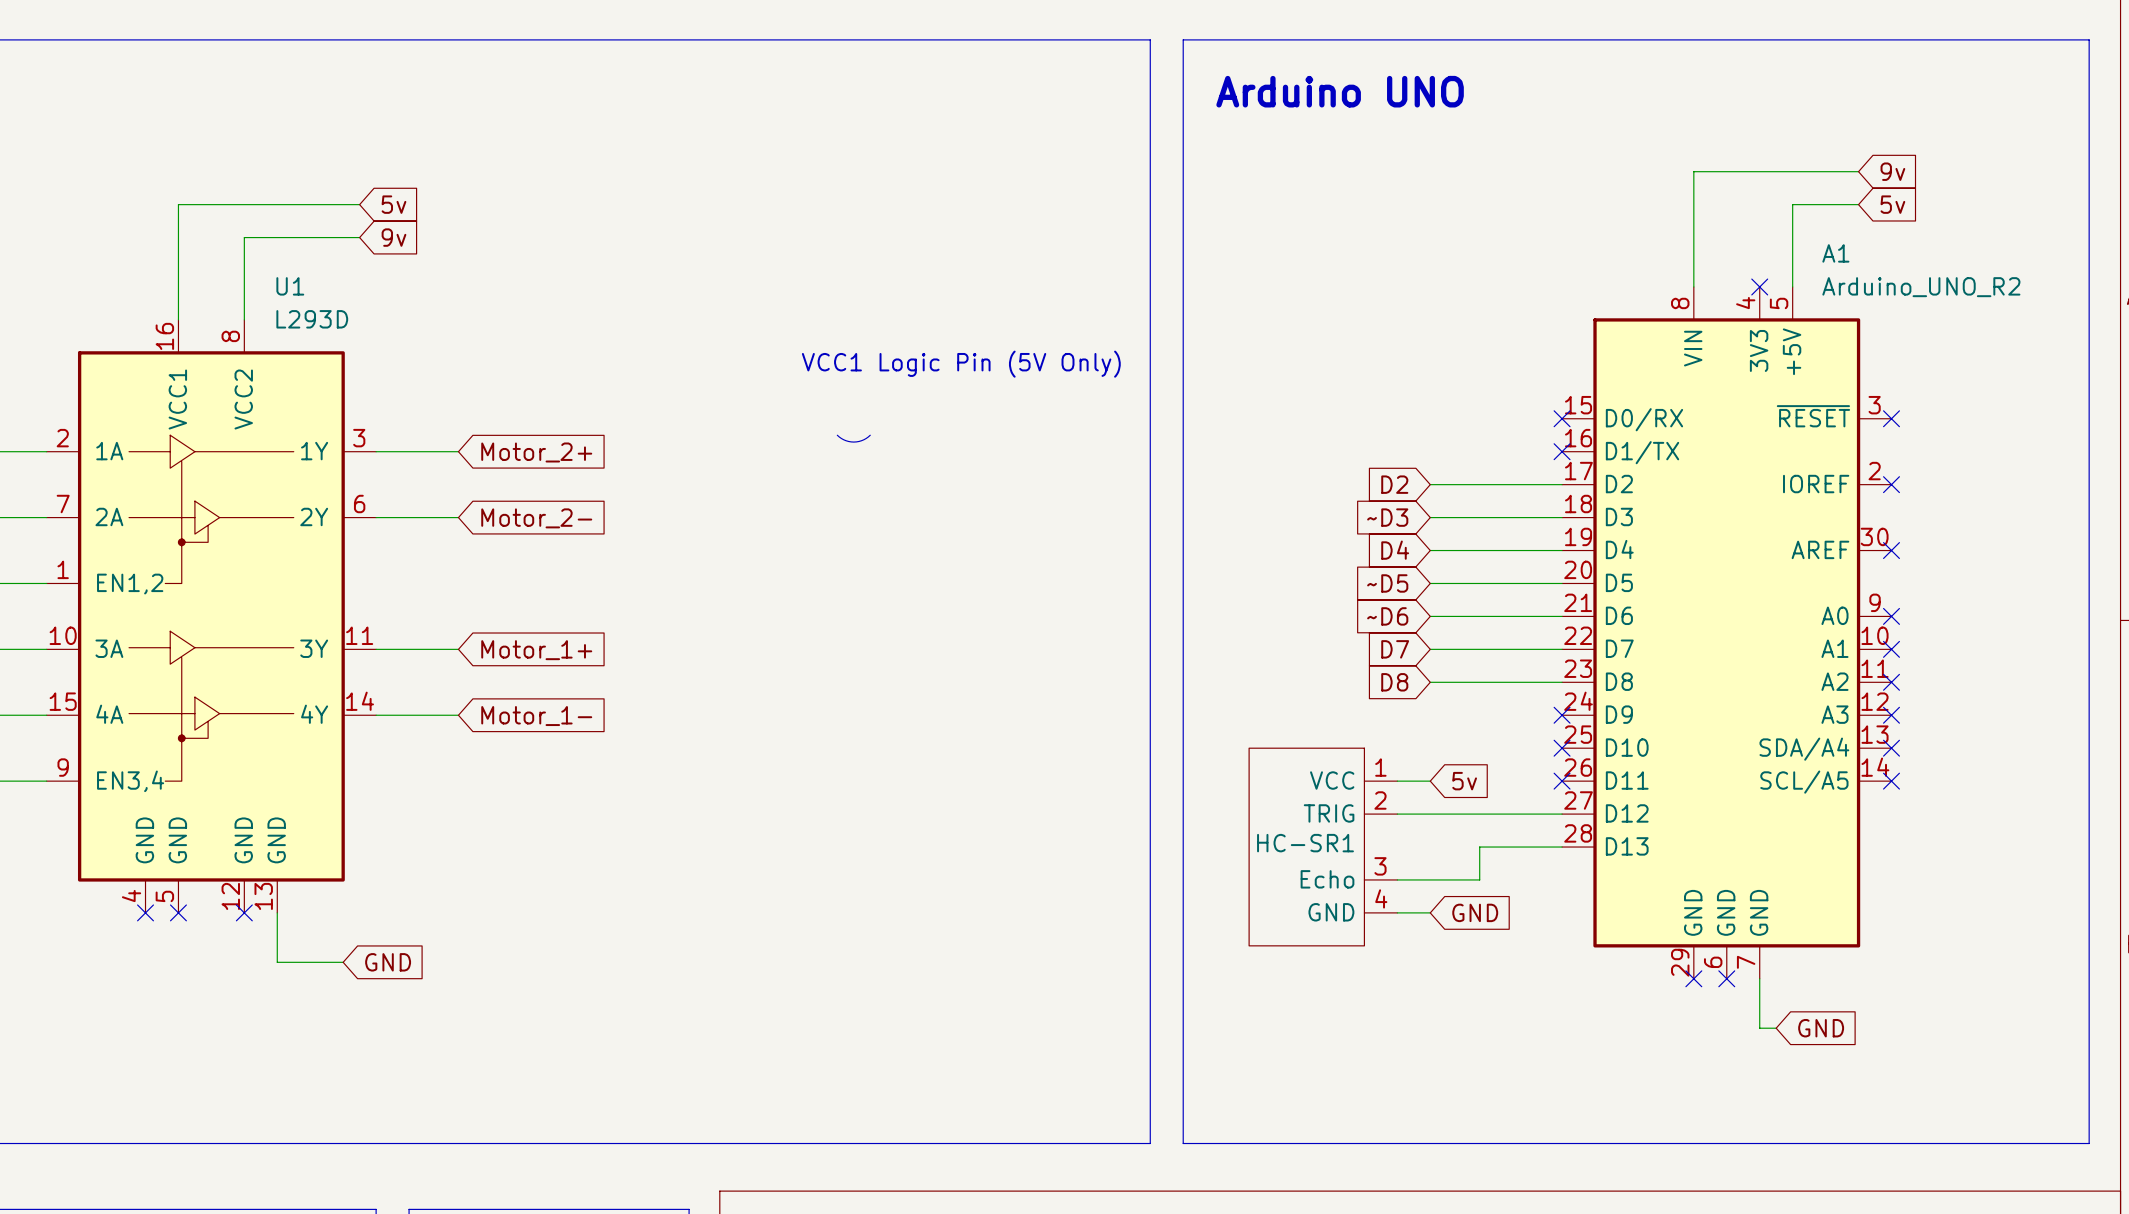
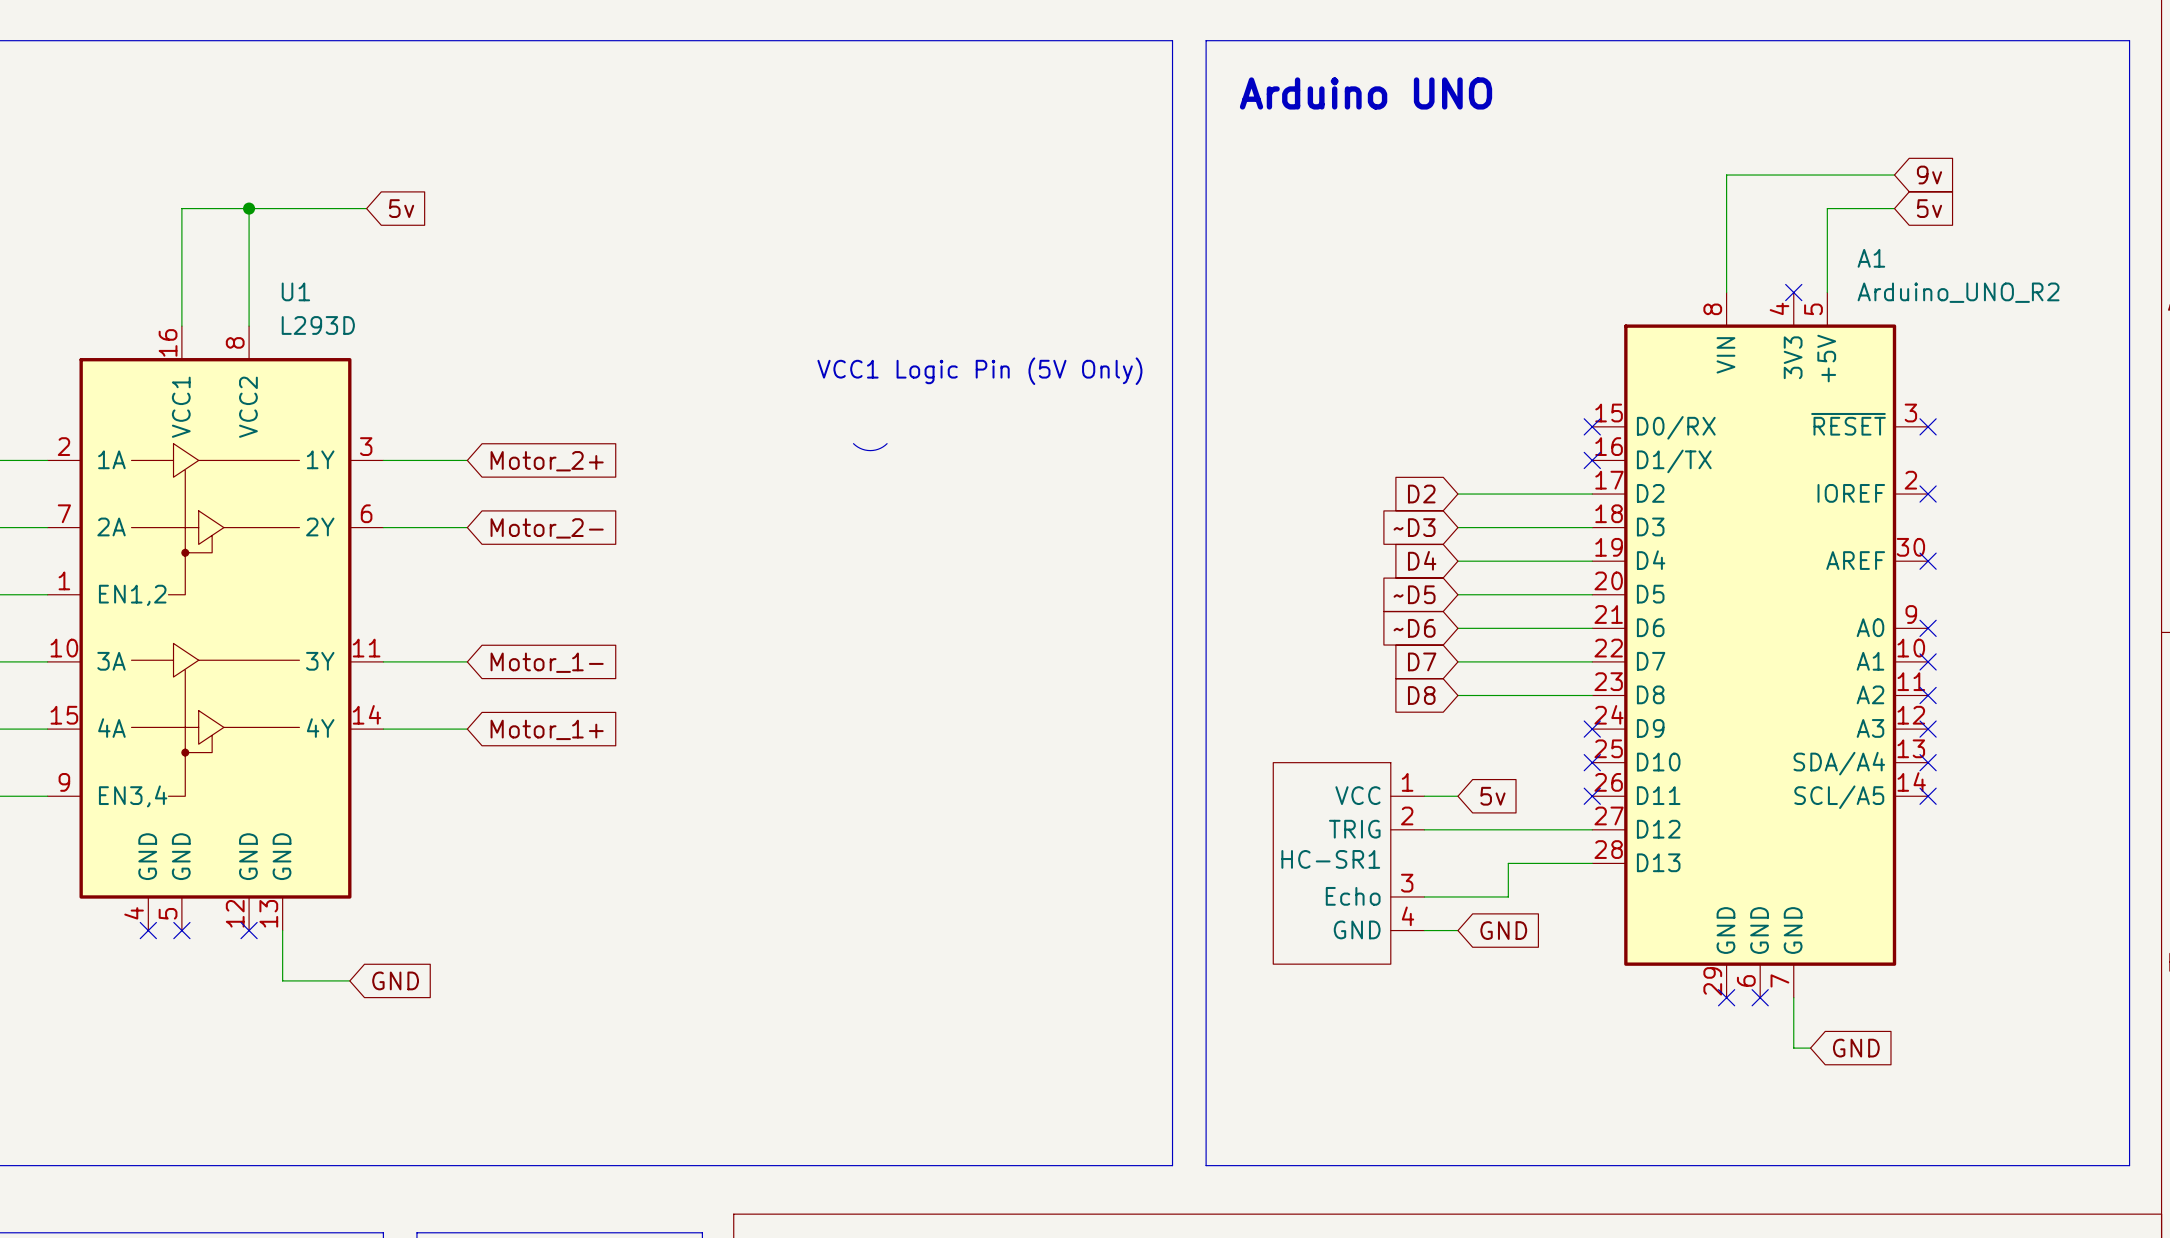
junction: none -> (249, 208)
wire: (244, 237) (359, 237) -> (249, 242) (249, 208)
global label: 9v (393, 237) -> none
global label: Motor_1+ (536, 650) -> Motor_1- (547, 662)
global label: Motor_1- (536, 716) -> Motor_1+ (547, 729)

